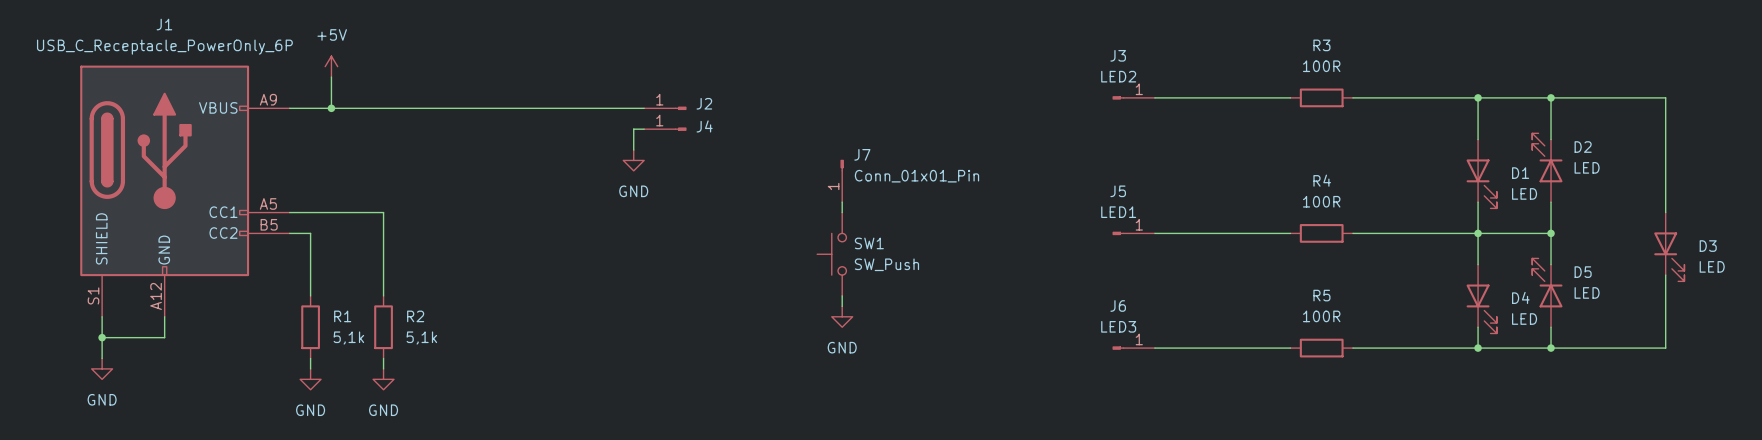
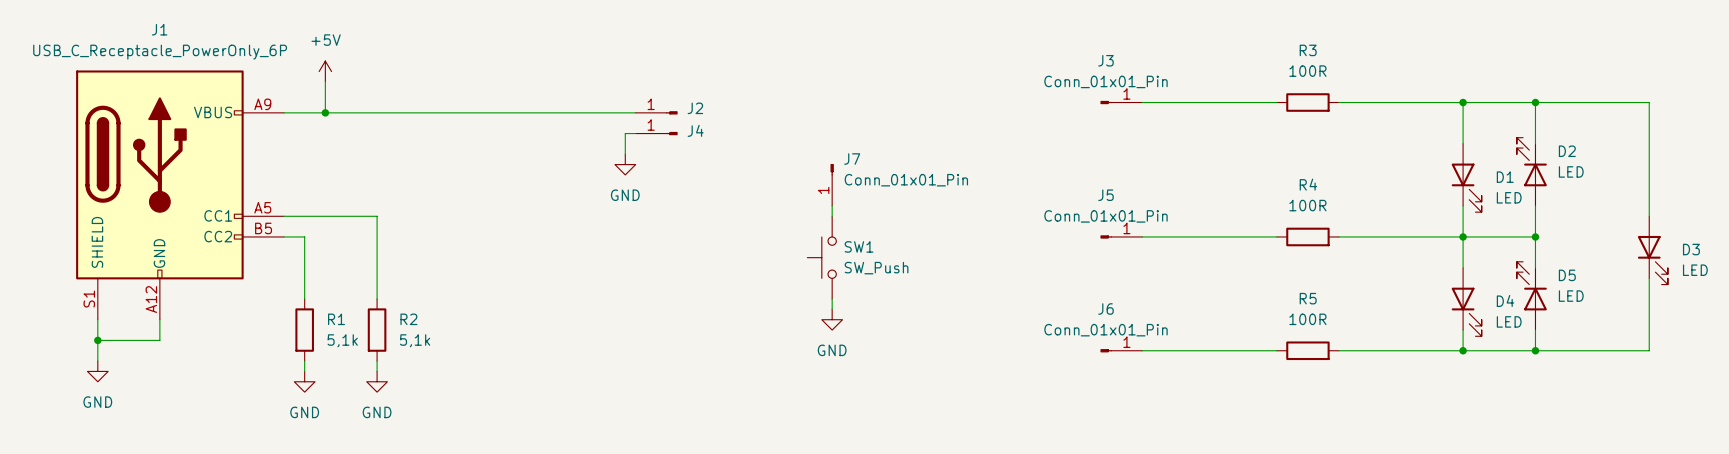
J3 value: LED2 (1118, 76) -> Conn_01x01_Pin (1106, 81)
J5 value: LED1 (1118, 212) -> Conn_01x01_Pin (1106, 216)
J6 value: LED3 (1118, 326) -> Conn_01x01_Pin (1106, 330)

